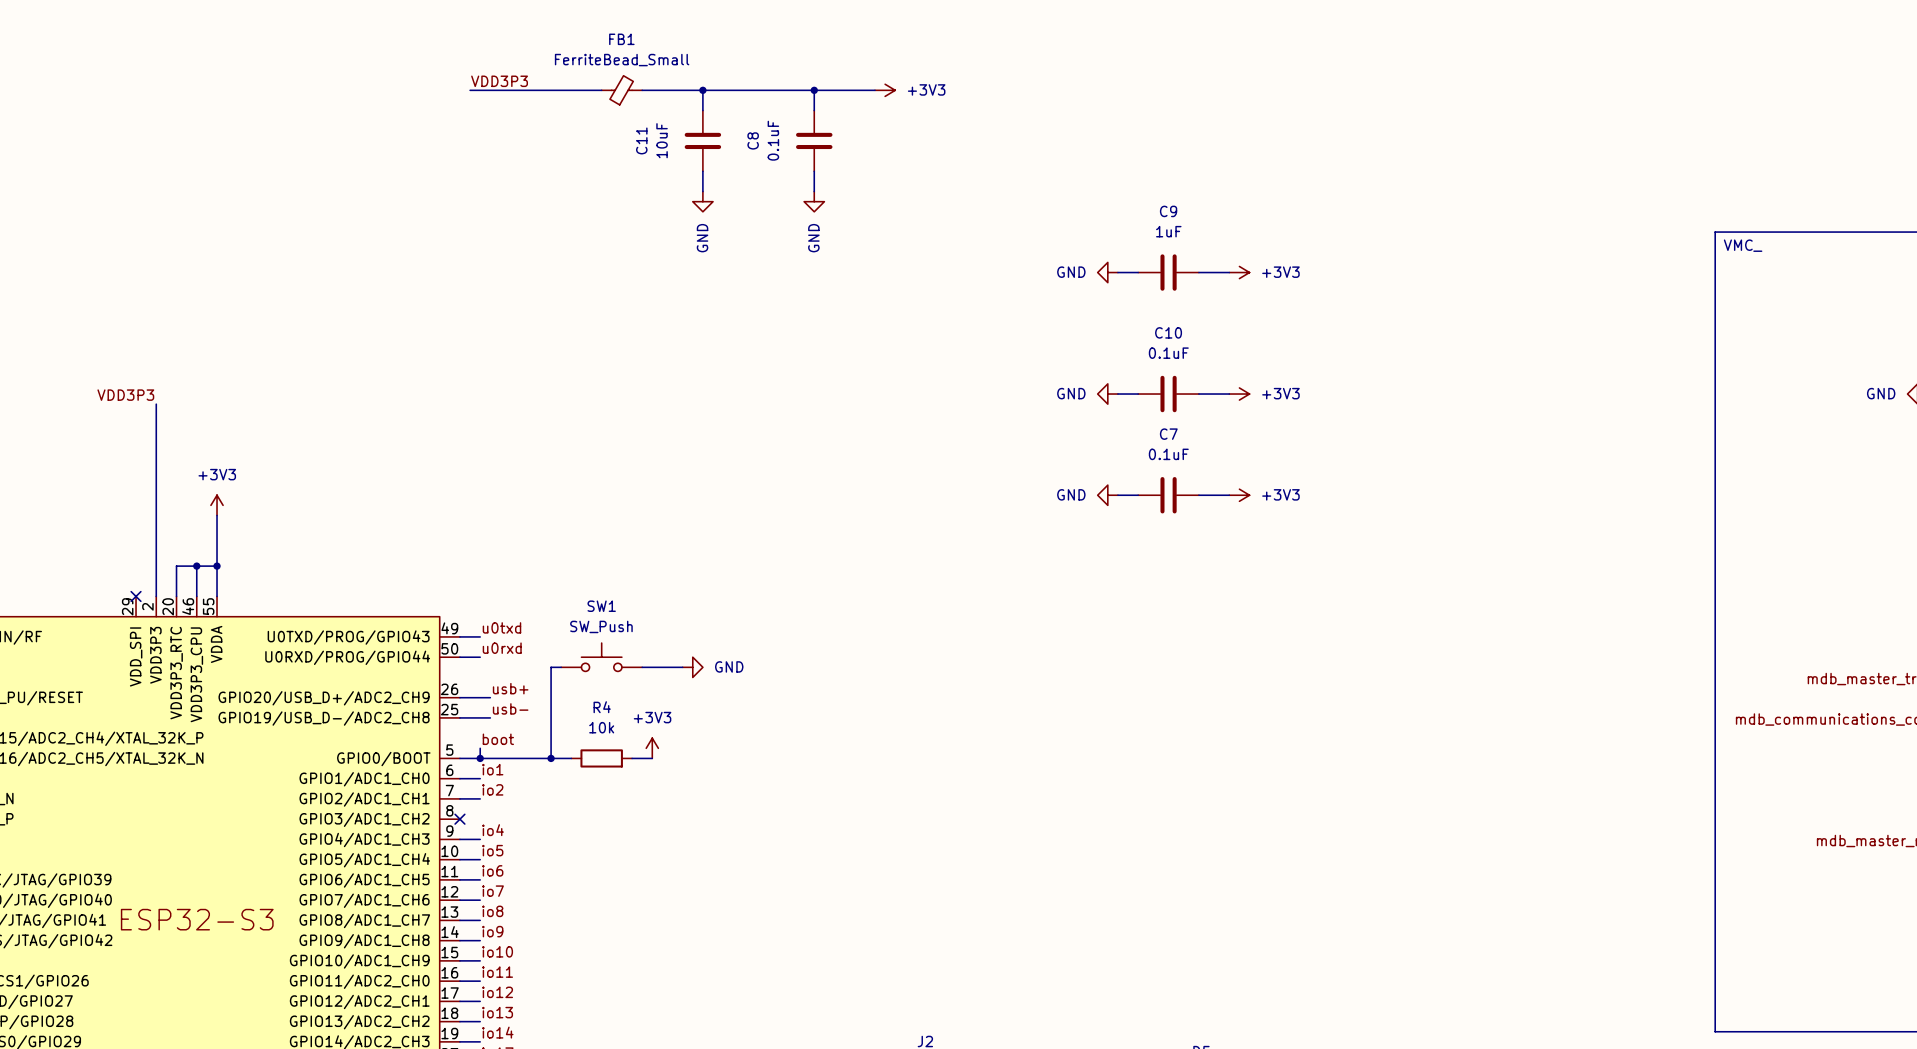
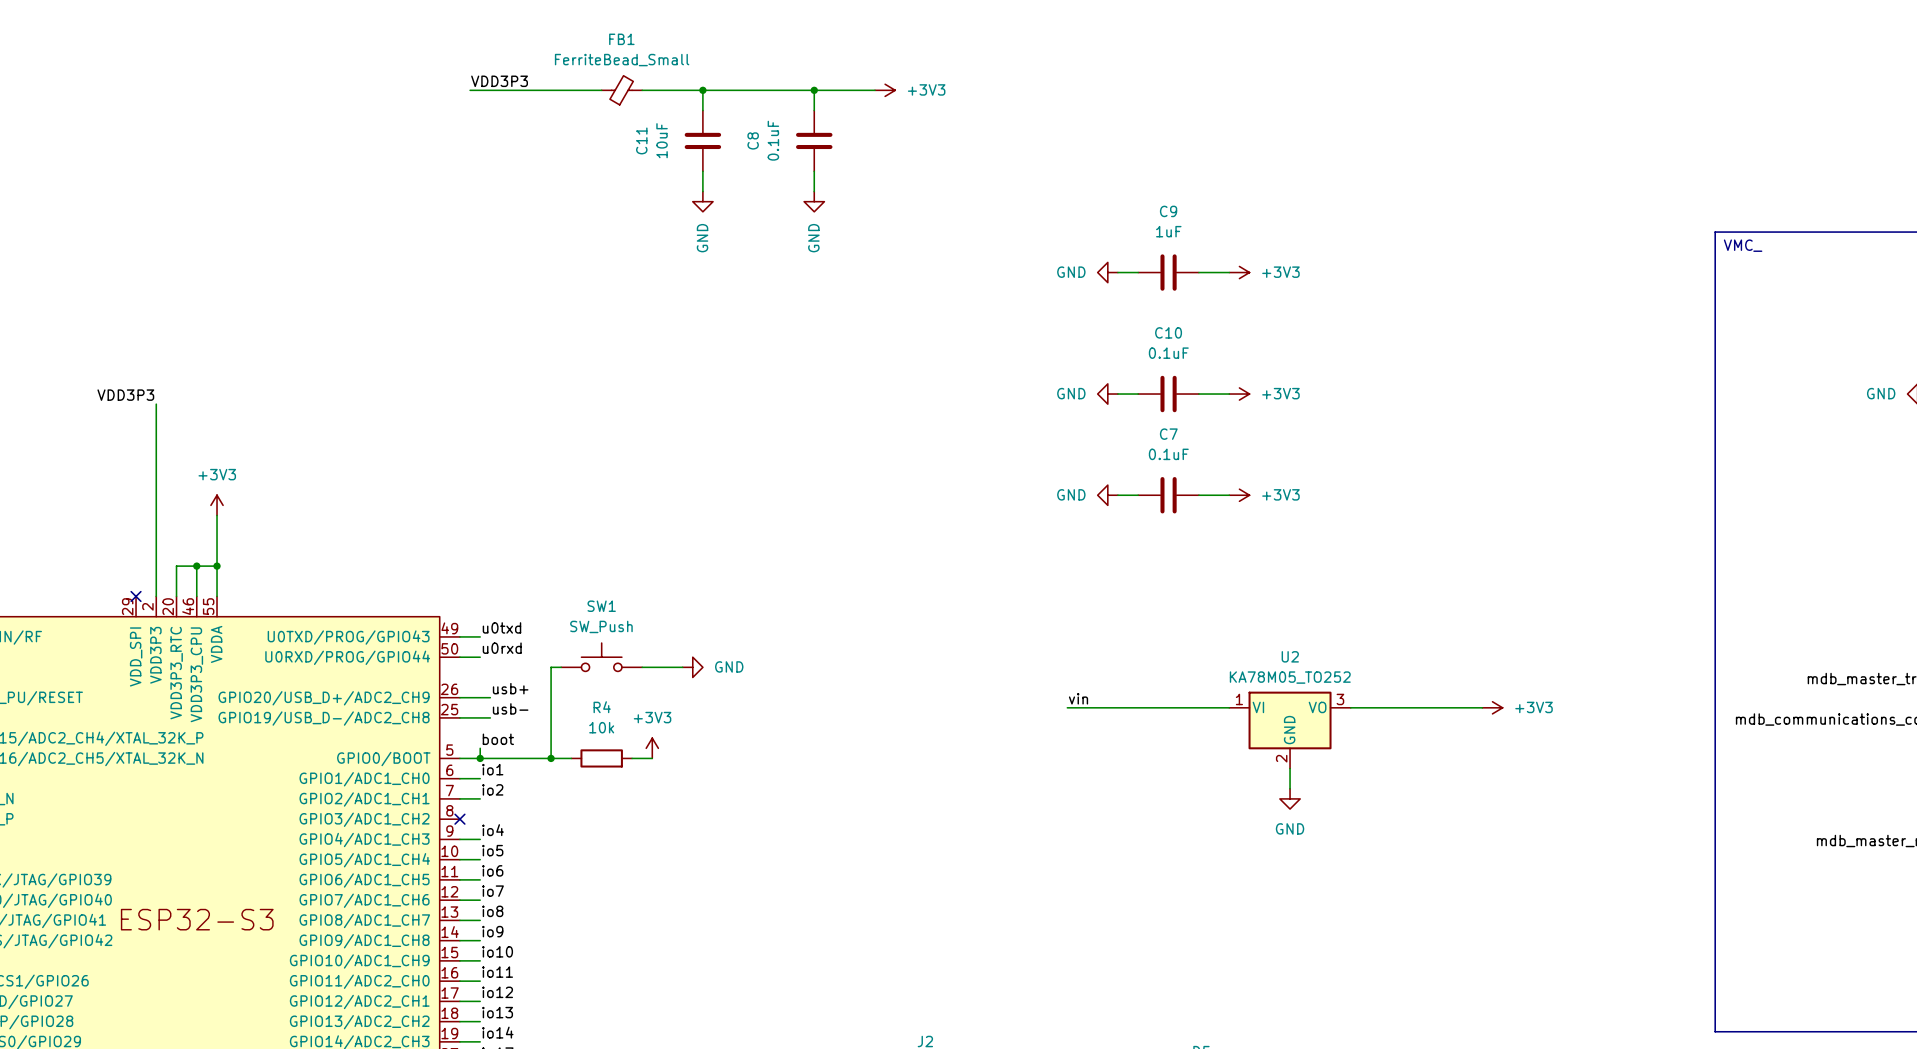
label: none -> vin (1078, 698)
wire: none -> (1067, 707) (1229, 707)
wire: none -> (1350, 707) (1482, 707)
power symbol: none -> +3V3 (1492, 707)
U2: none -> KA78M05_TO252 (1290, 730)
wire: none -> (1290, 768) (1290, 788)
power symbol: none -> GND (1290, 798)

